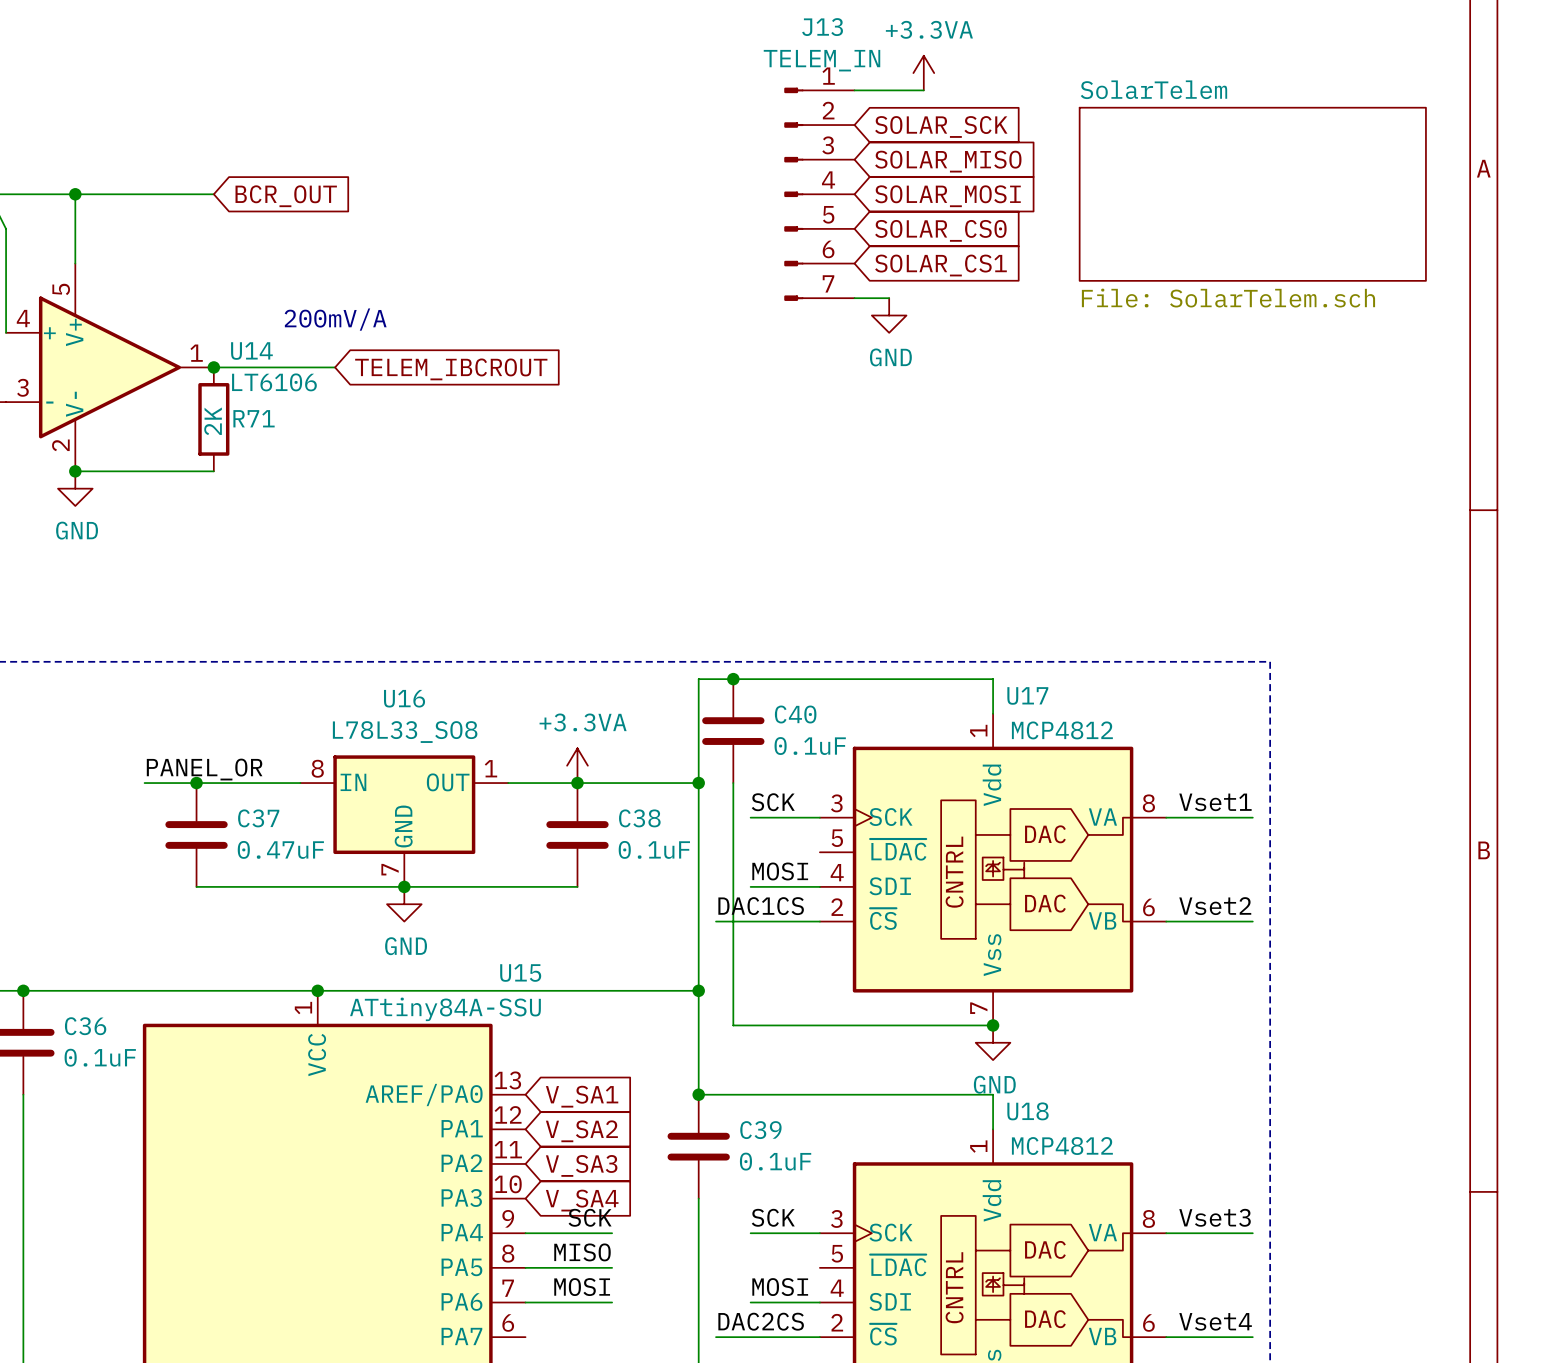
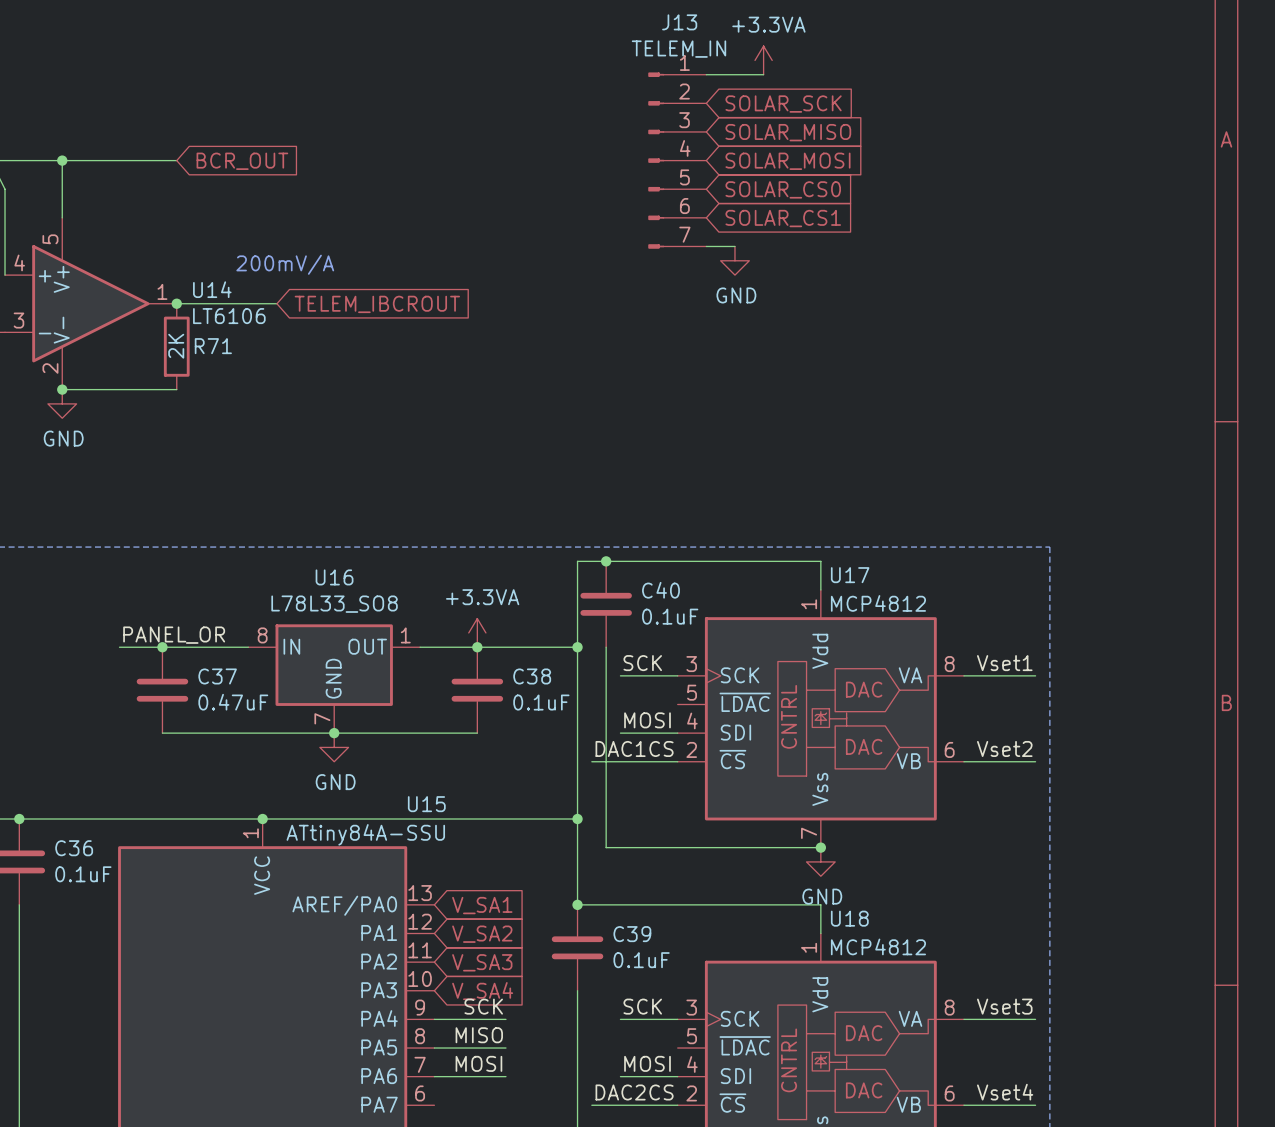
sheet SolarTelem: File: SolarTelem.sch (1252, 194) -> none

